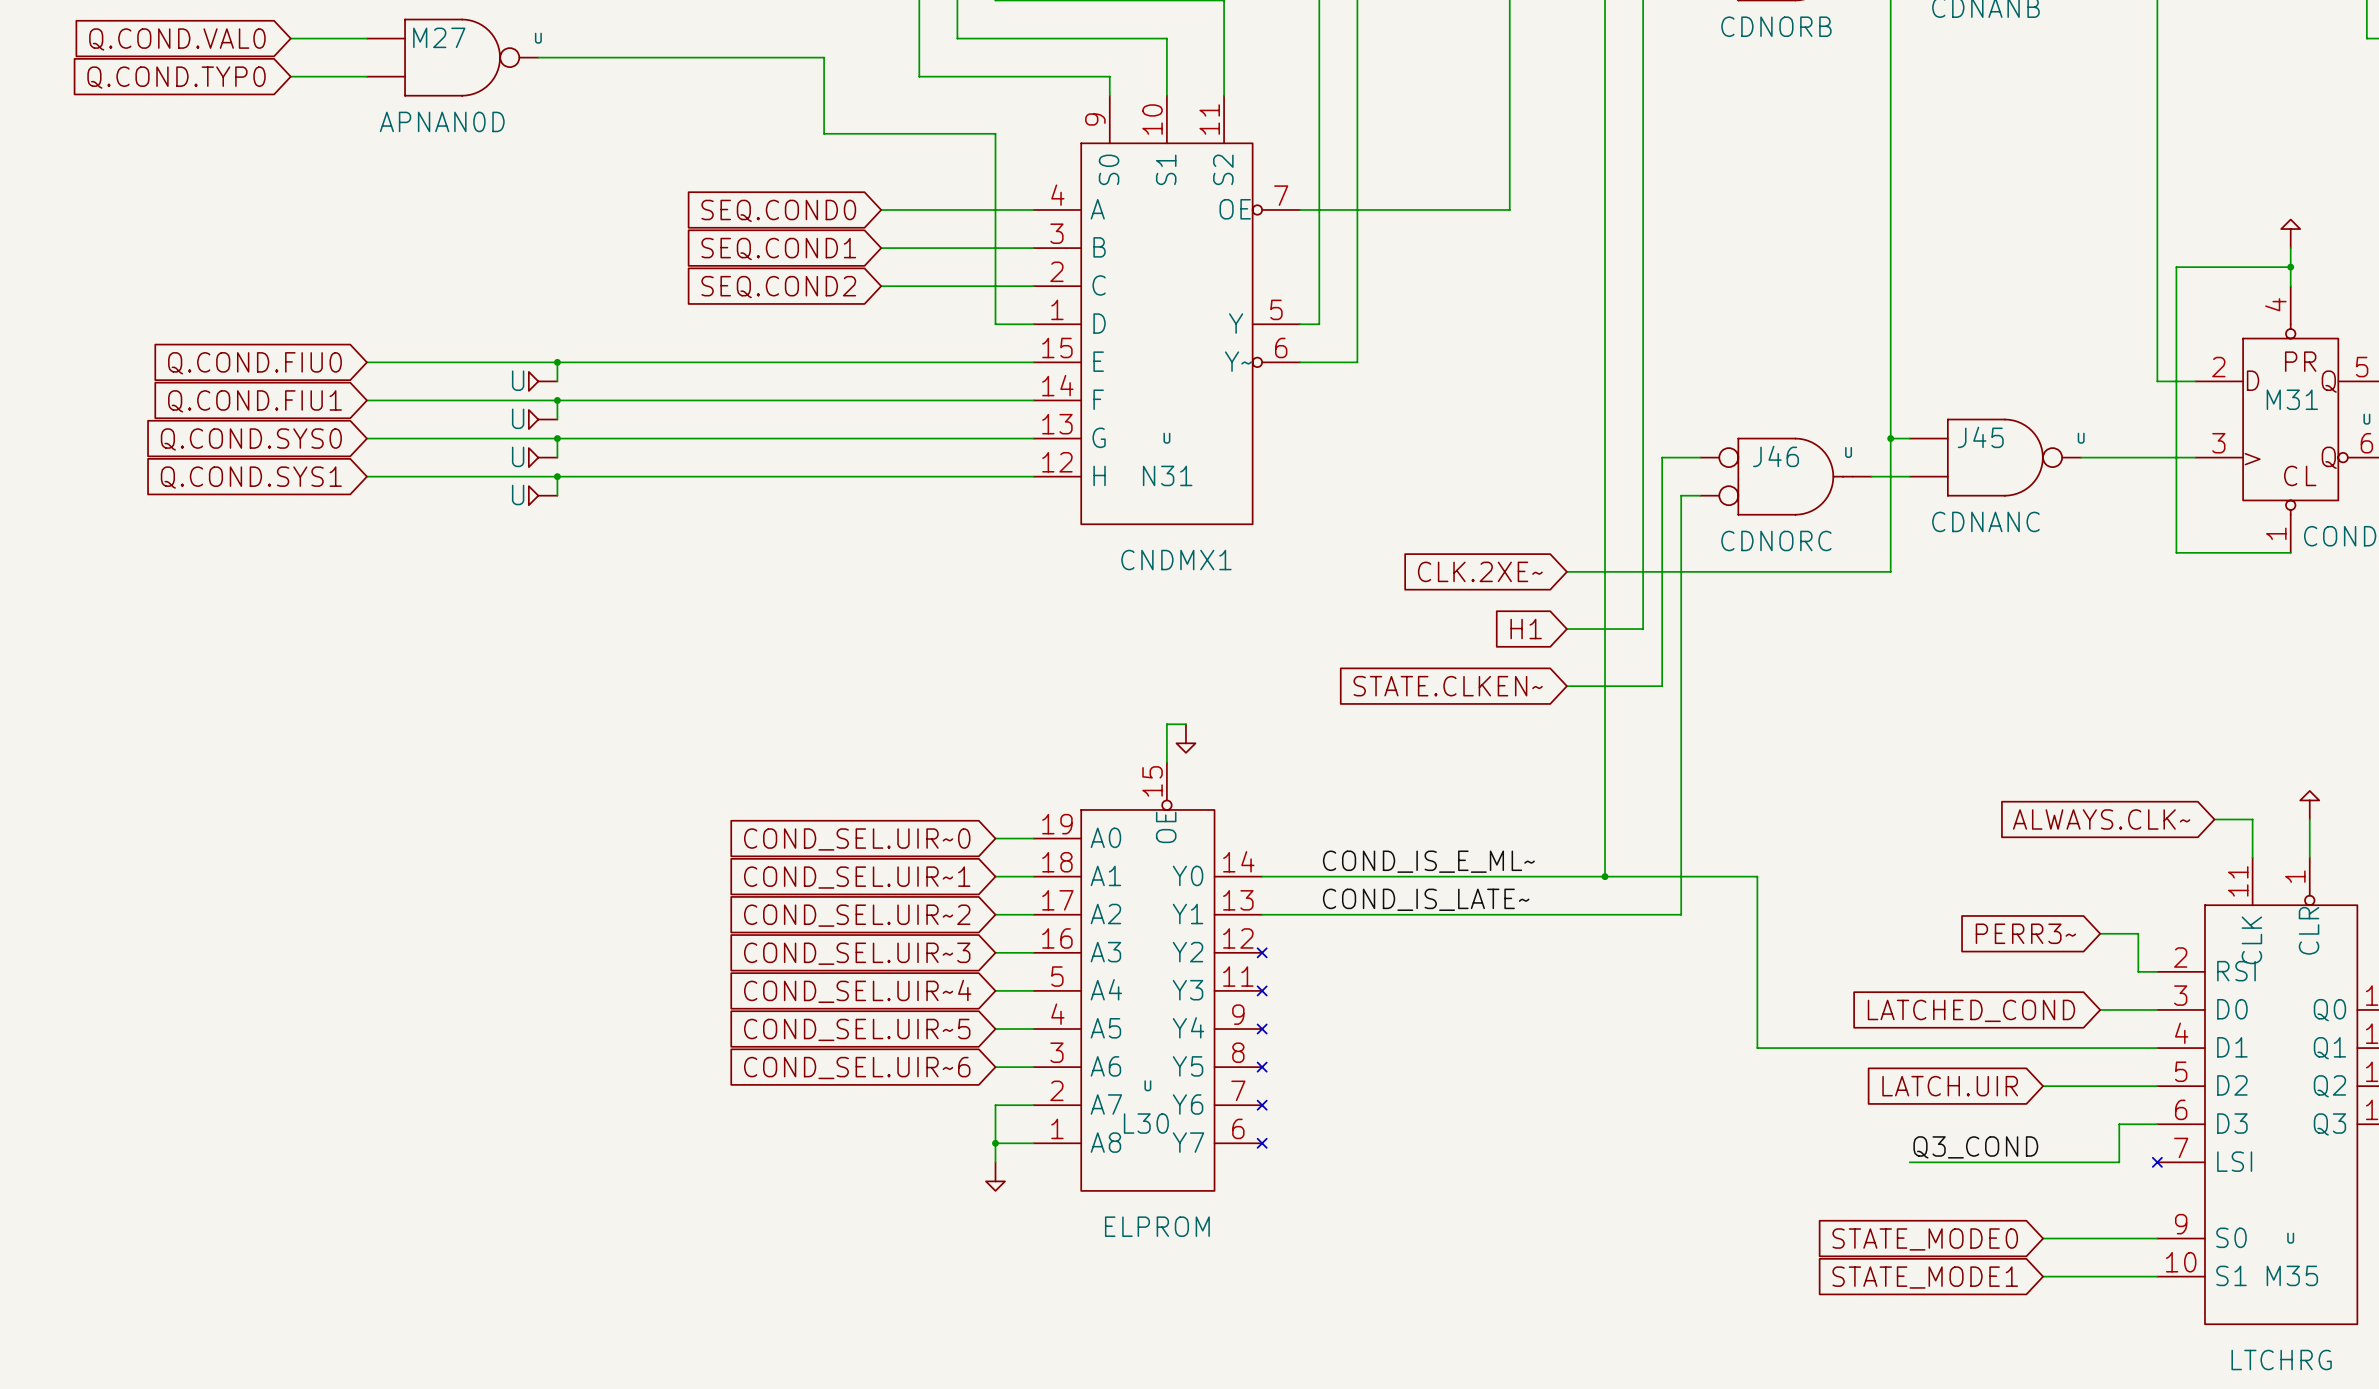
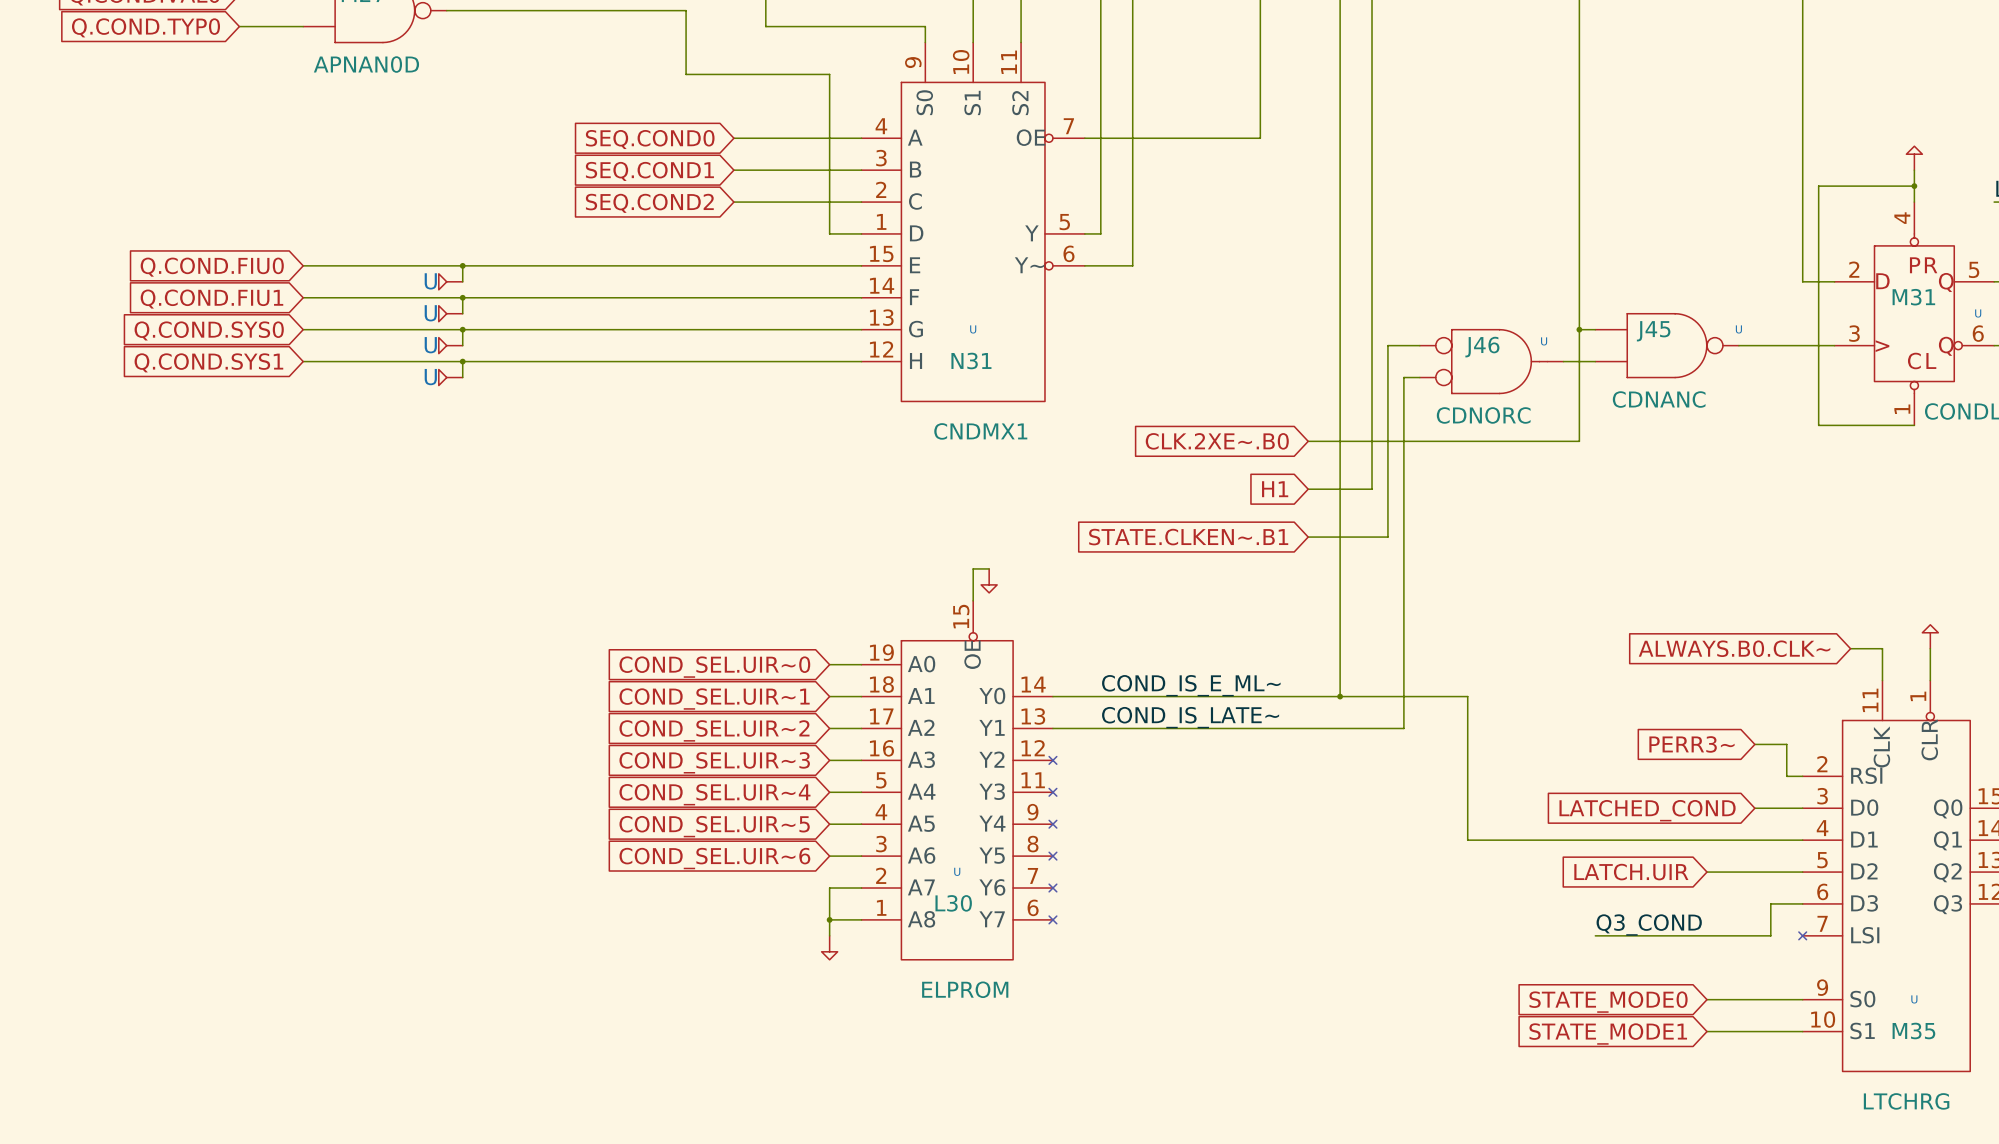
global label: CLK.2XE~ (1480, 571) -> CLK.2XE~.B0 (1217, 441)
global label: STATE.CLKEN~ (1448, 686) -> STATE.CLKEN~.B1 (1188, 537)
global label: ALWAYS.CLK~ (2101, 819) -> ALWAYS.B0.CLK~ (1734, 648)

